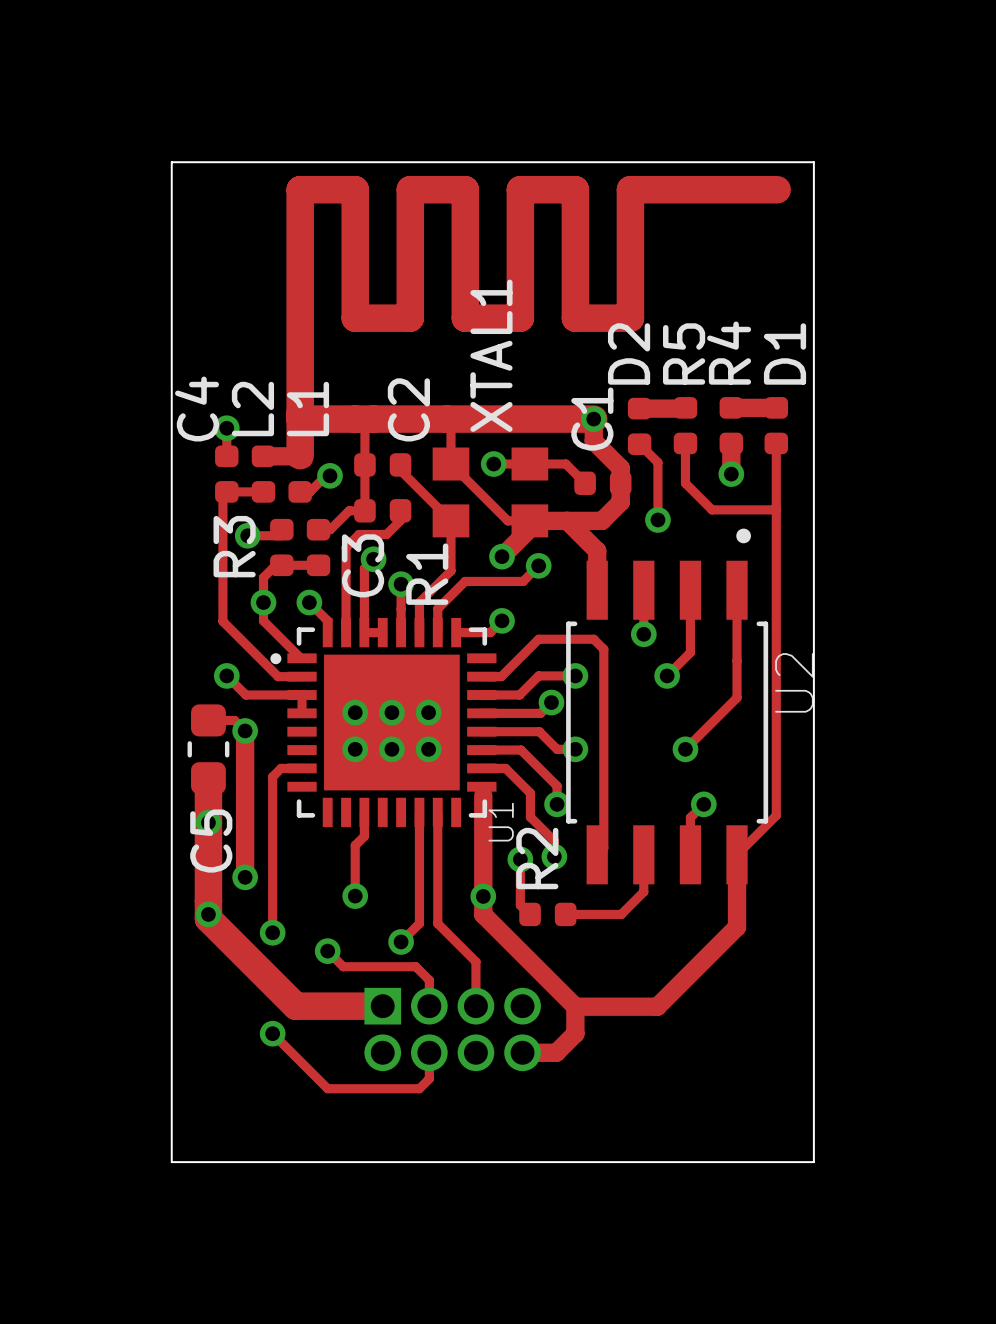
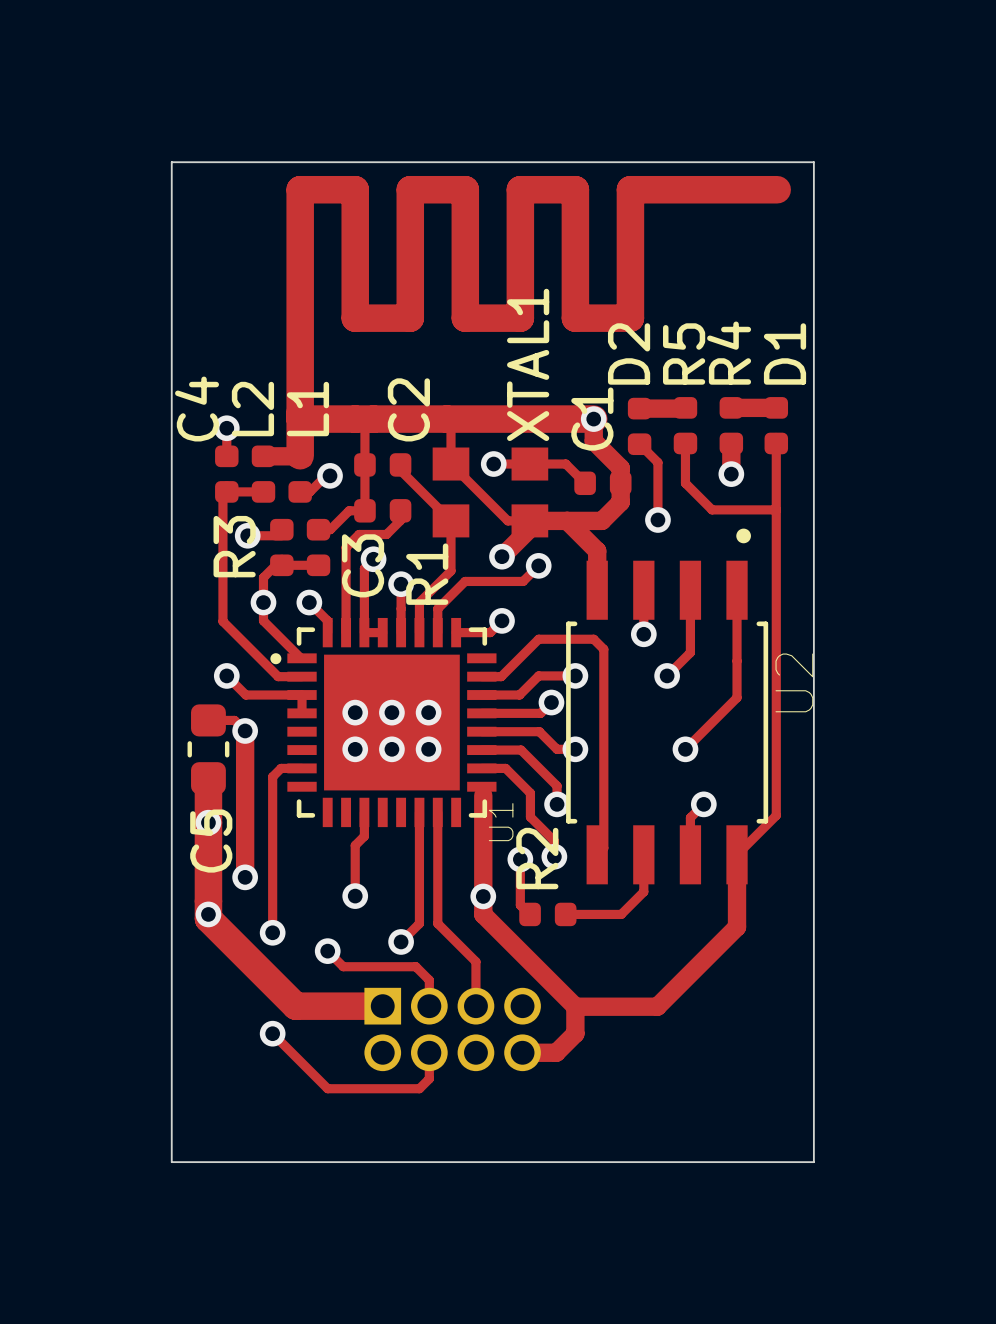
XTAL1 name position: XTAL1 (491, 355) -> XTAL1 (528, 364)

